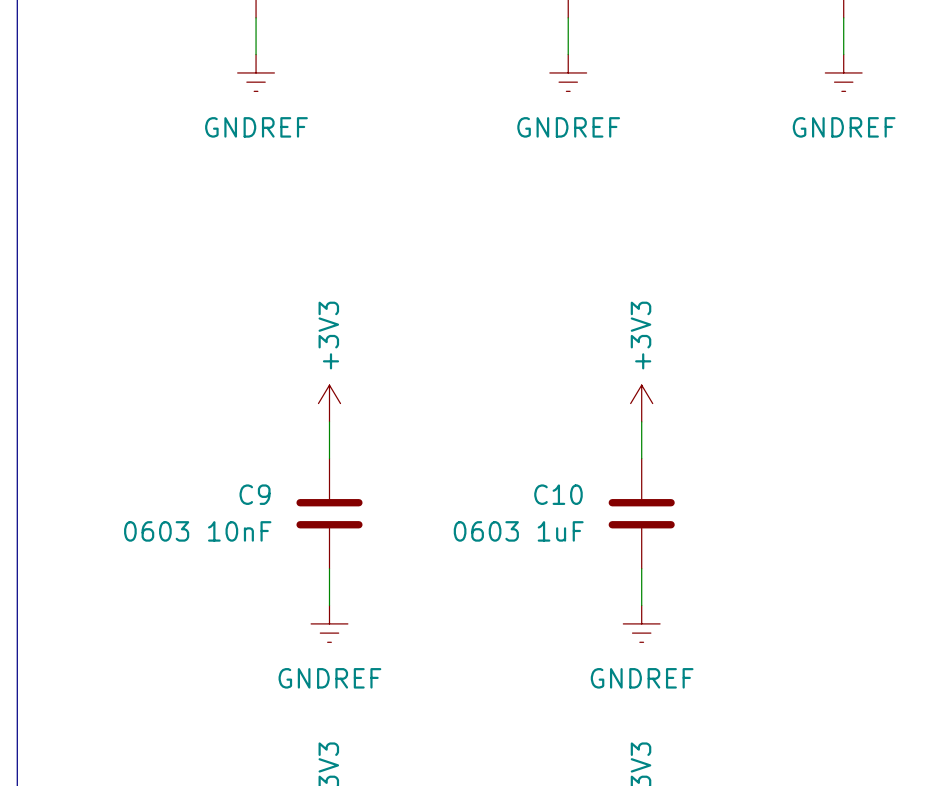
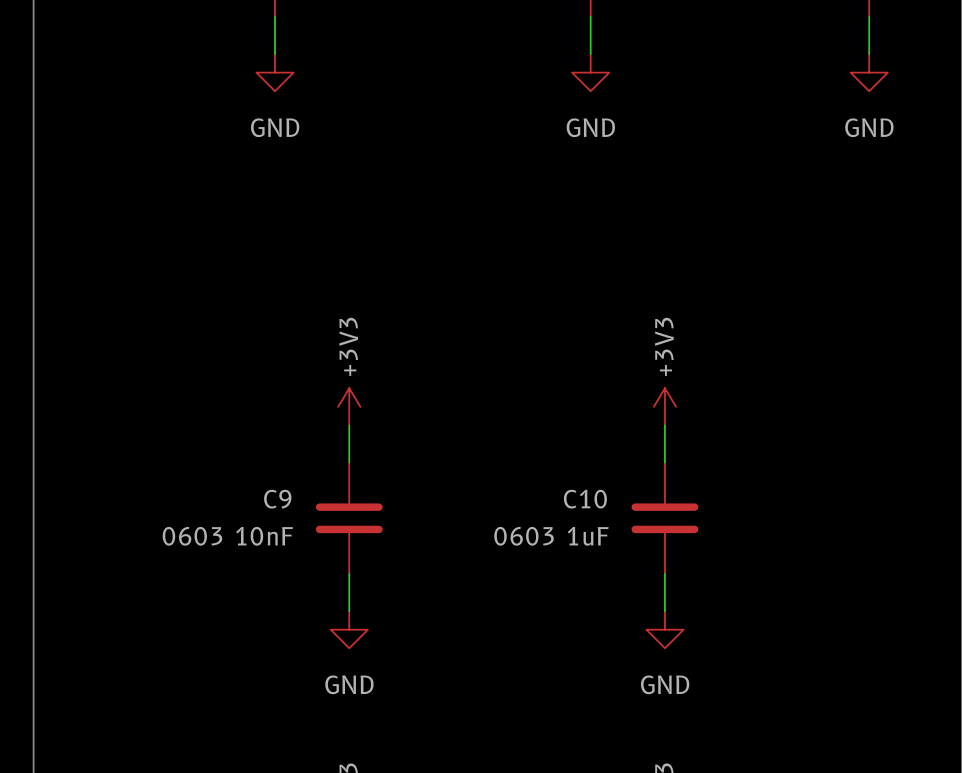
power symbol: GNDREF (256, 72) -> GND (274, 72)
power symbol: GNDREF (568, 72) -> GND (590, 72)
power symbol: GNDREF (843, 72) -> GND (869, 72)
power symbol: GNDREF (329, 623) -> GND (349, 629)
power symbol: GNDREF (641, 623) -> GND (664, 629)

